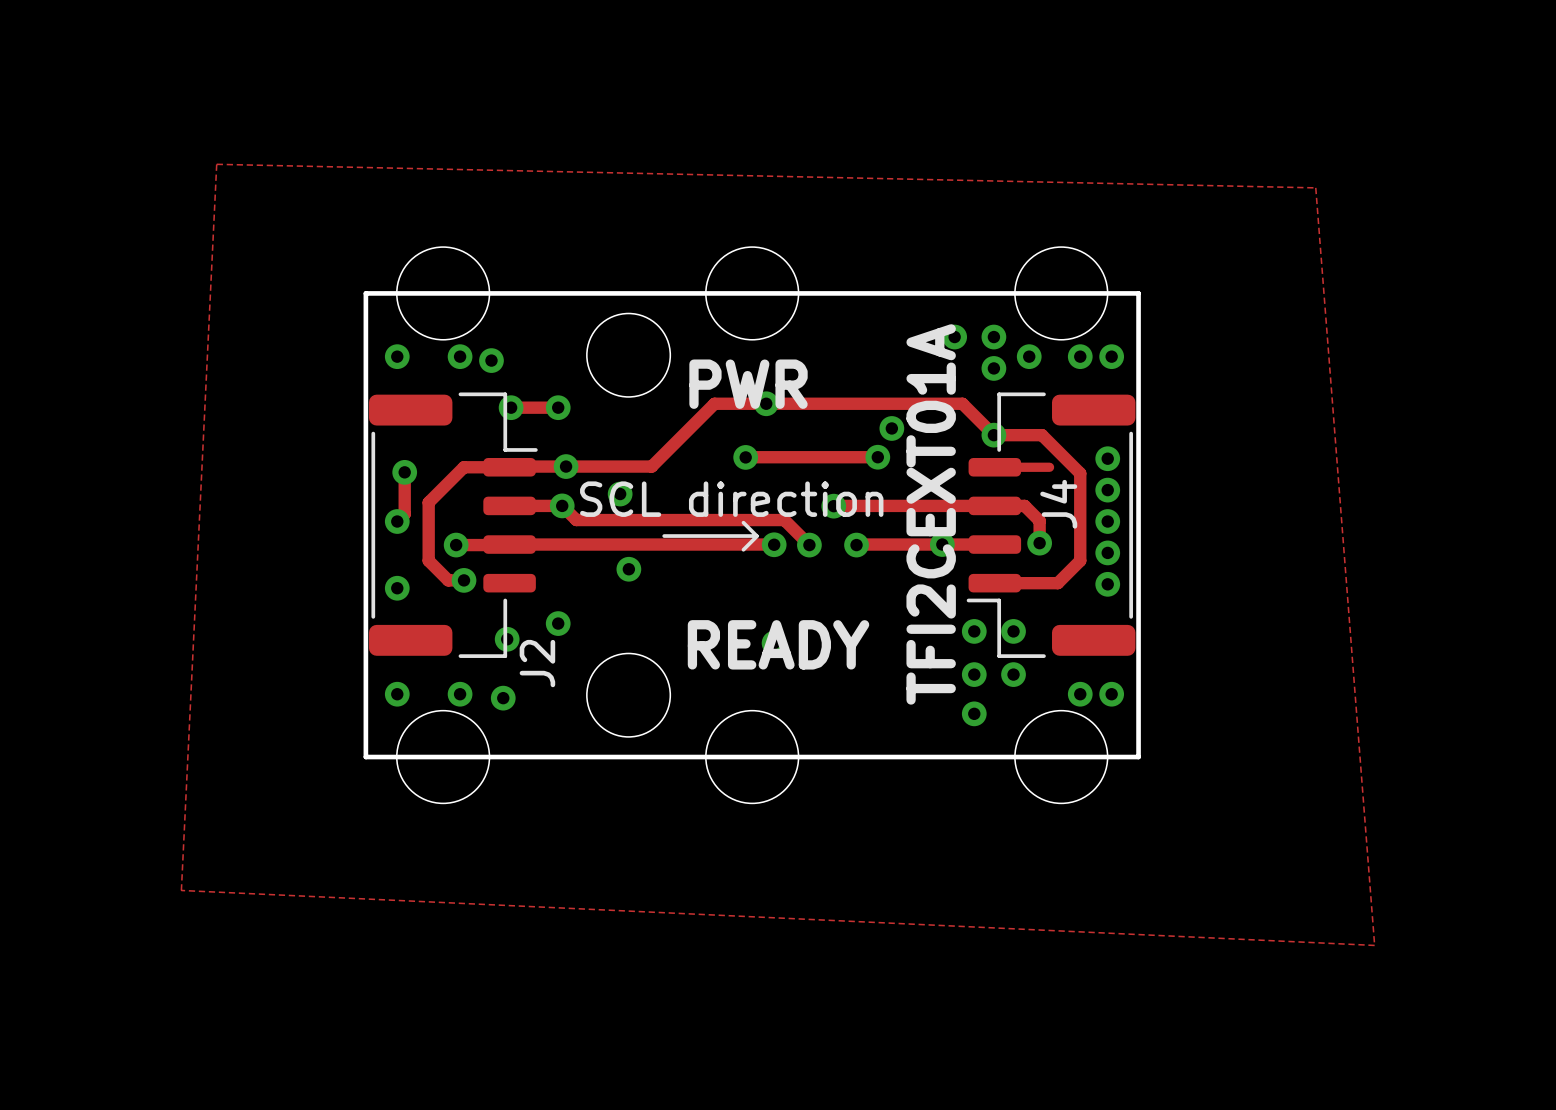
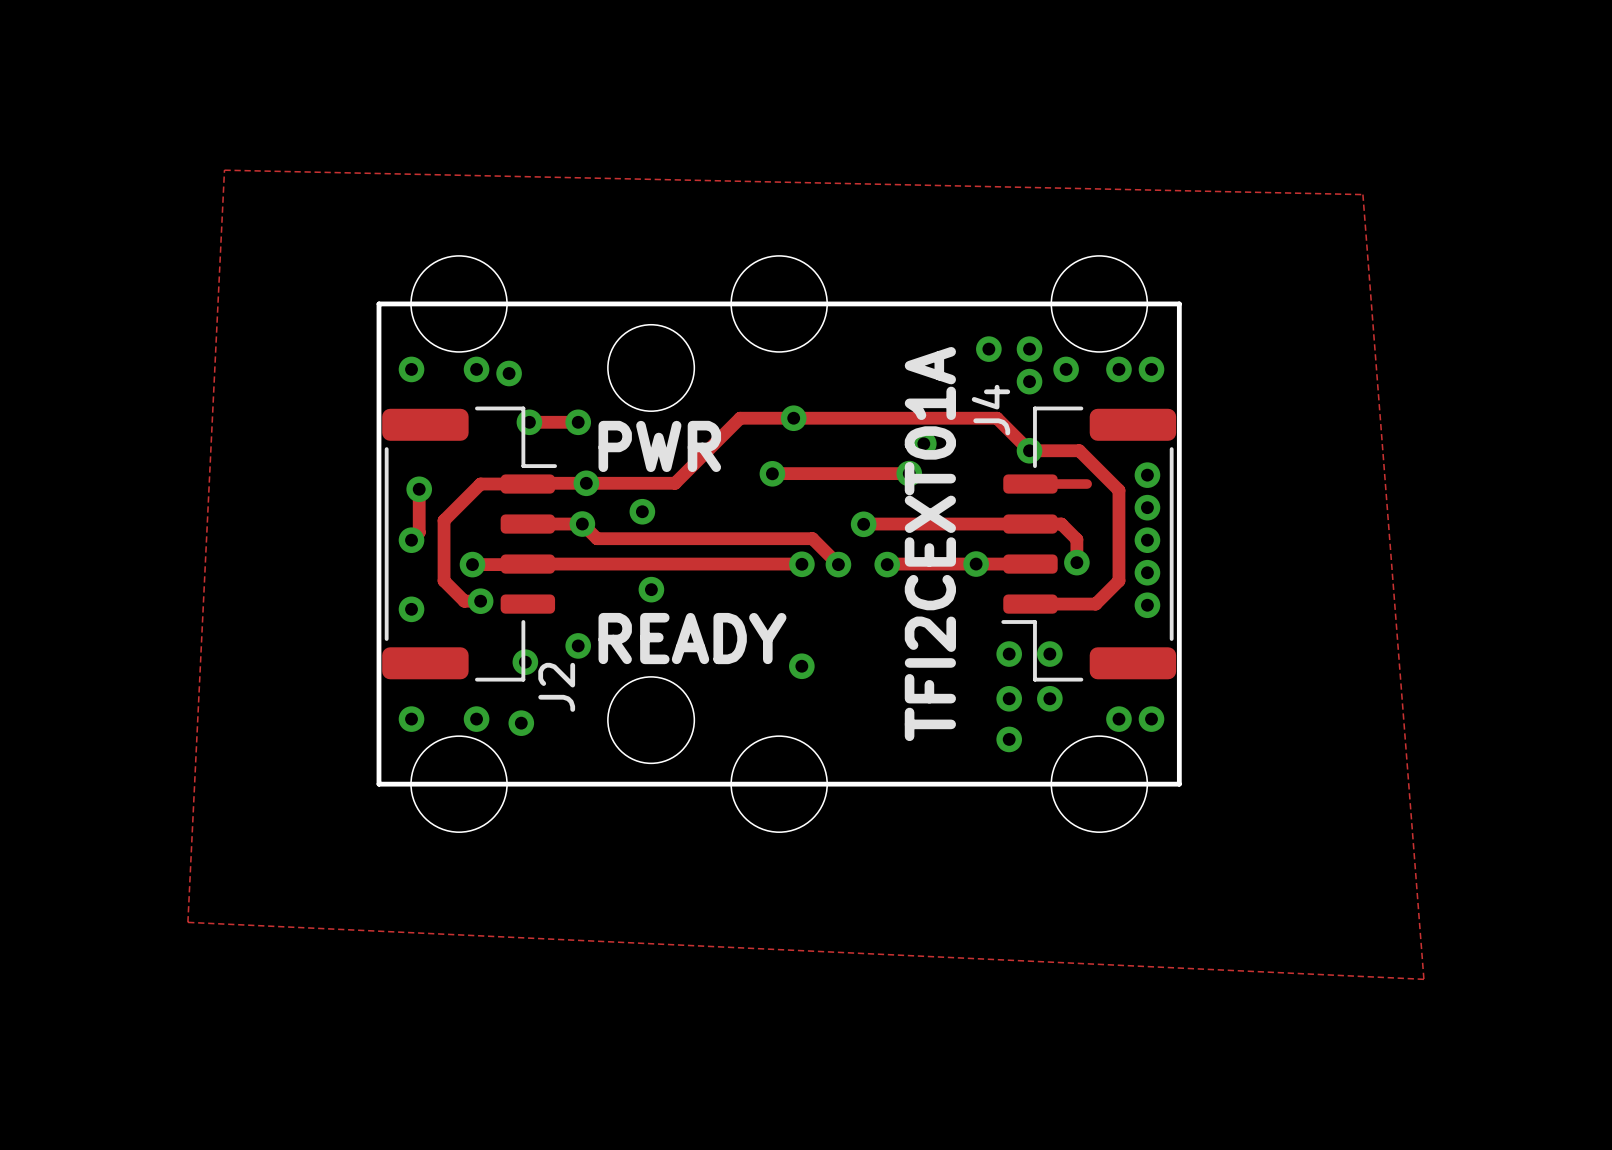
text position: PWR (748, 384) -> PWR (659, 446)
text: SCL direction (731, 499) -> none
J4 name position: J4 (1058, 504) -> J4 (990, 410)
text position: TFI2CEXT01A (931, 514) -> TFI2CEXT01A (930, 544)
line: (743, 522) (756, 536) (664, 536) -> none
line: (756, 536) (743, 549) -> none
text position: READY (778, 644) -> READY (692, 638)

